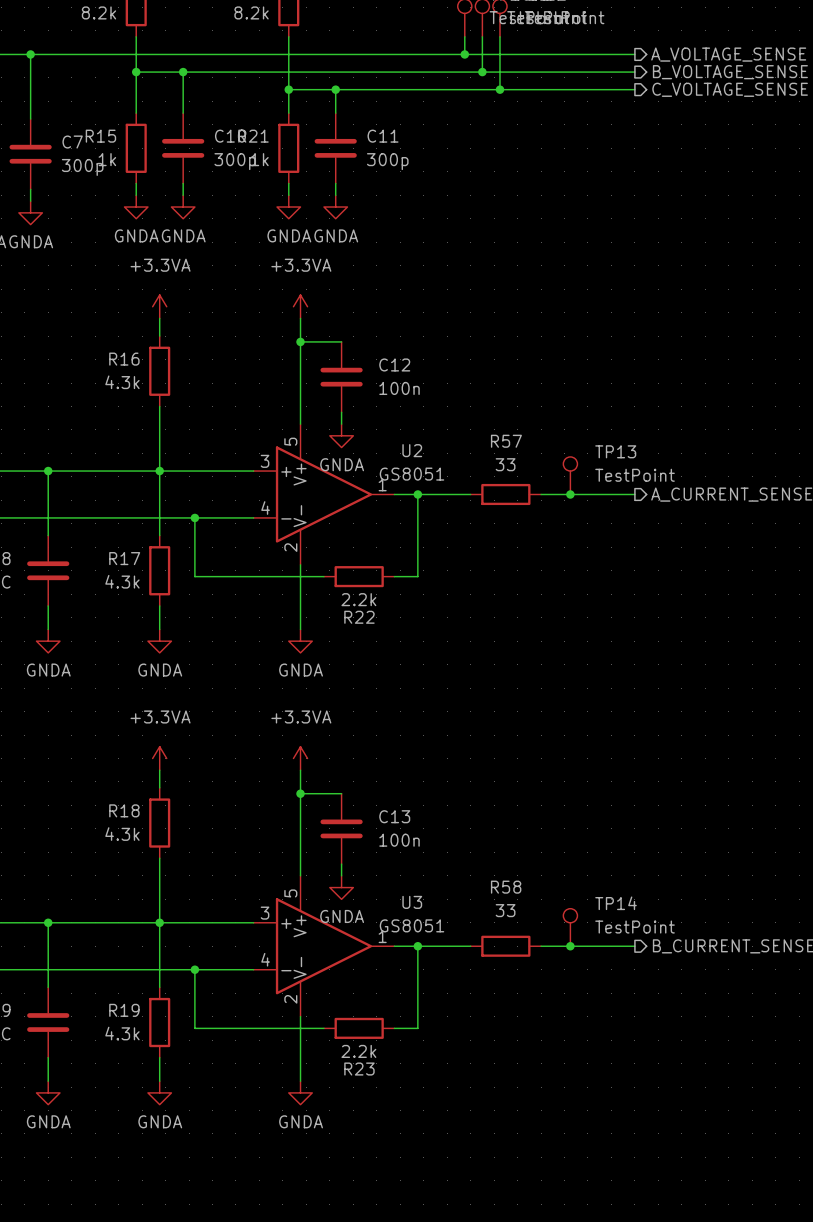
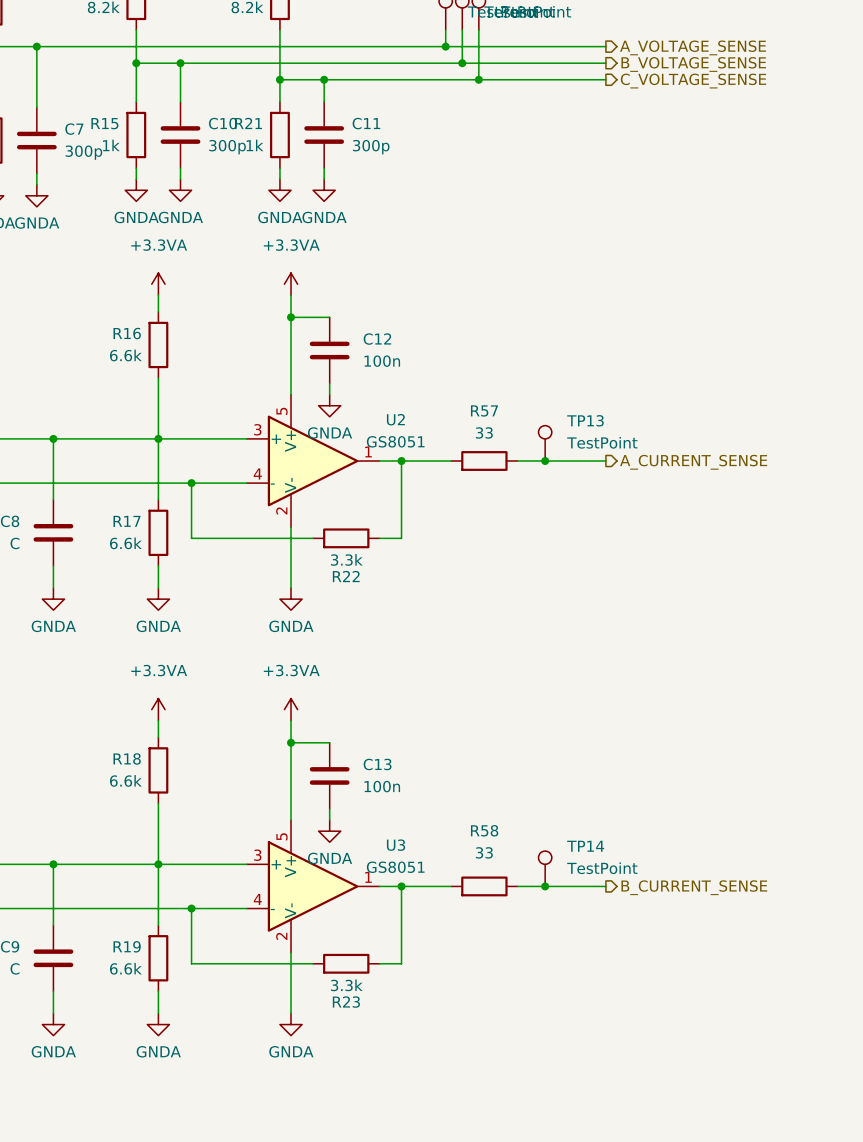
R16 value: 4.3k (122, 382) -> 6.6k (125, 355)
R17 value: 4.3k (122, 581) -> 6.6k (125, 543)
R22 value: 2.2k (358, 599) -> 3.3k (346, 559)
R18 value: 4.3k (122, 834) -> 6.6k (125, 780)
R19 value: 4.3k (122, 1033) -> 6.6k (125, 968)
R23 value: 2.2k (358, 1051) -> 3.3k (346, 985)

